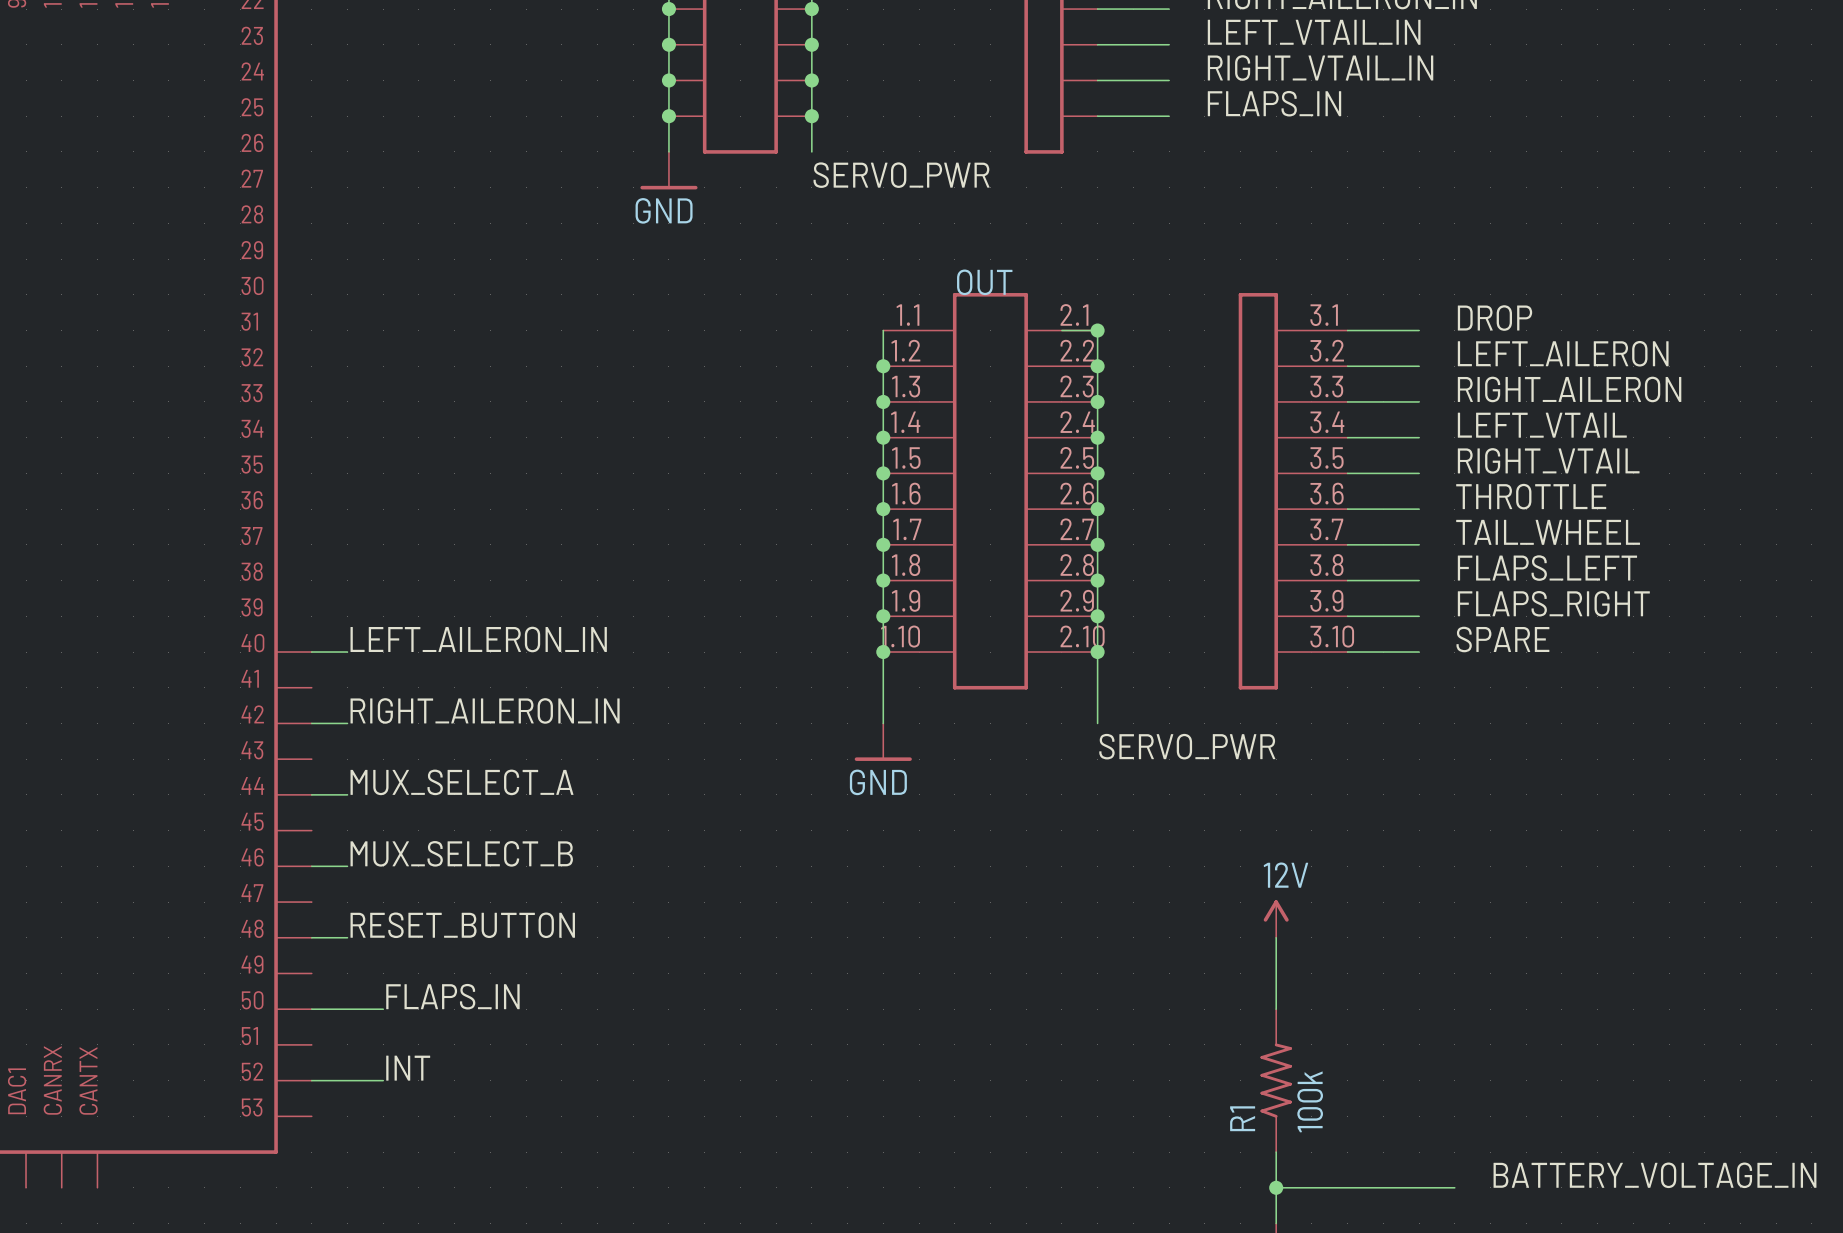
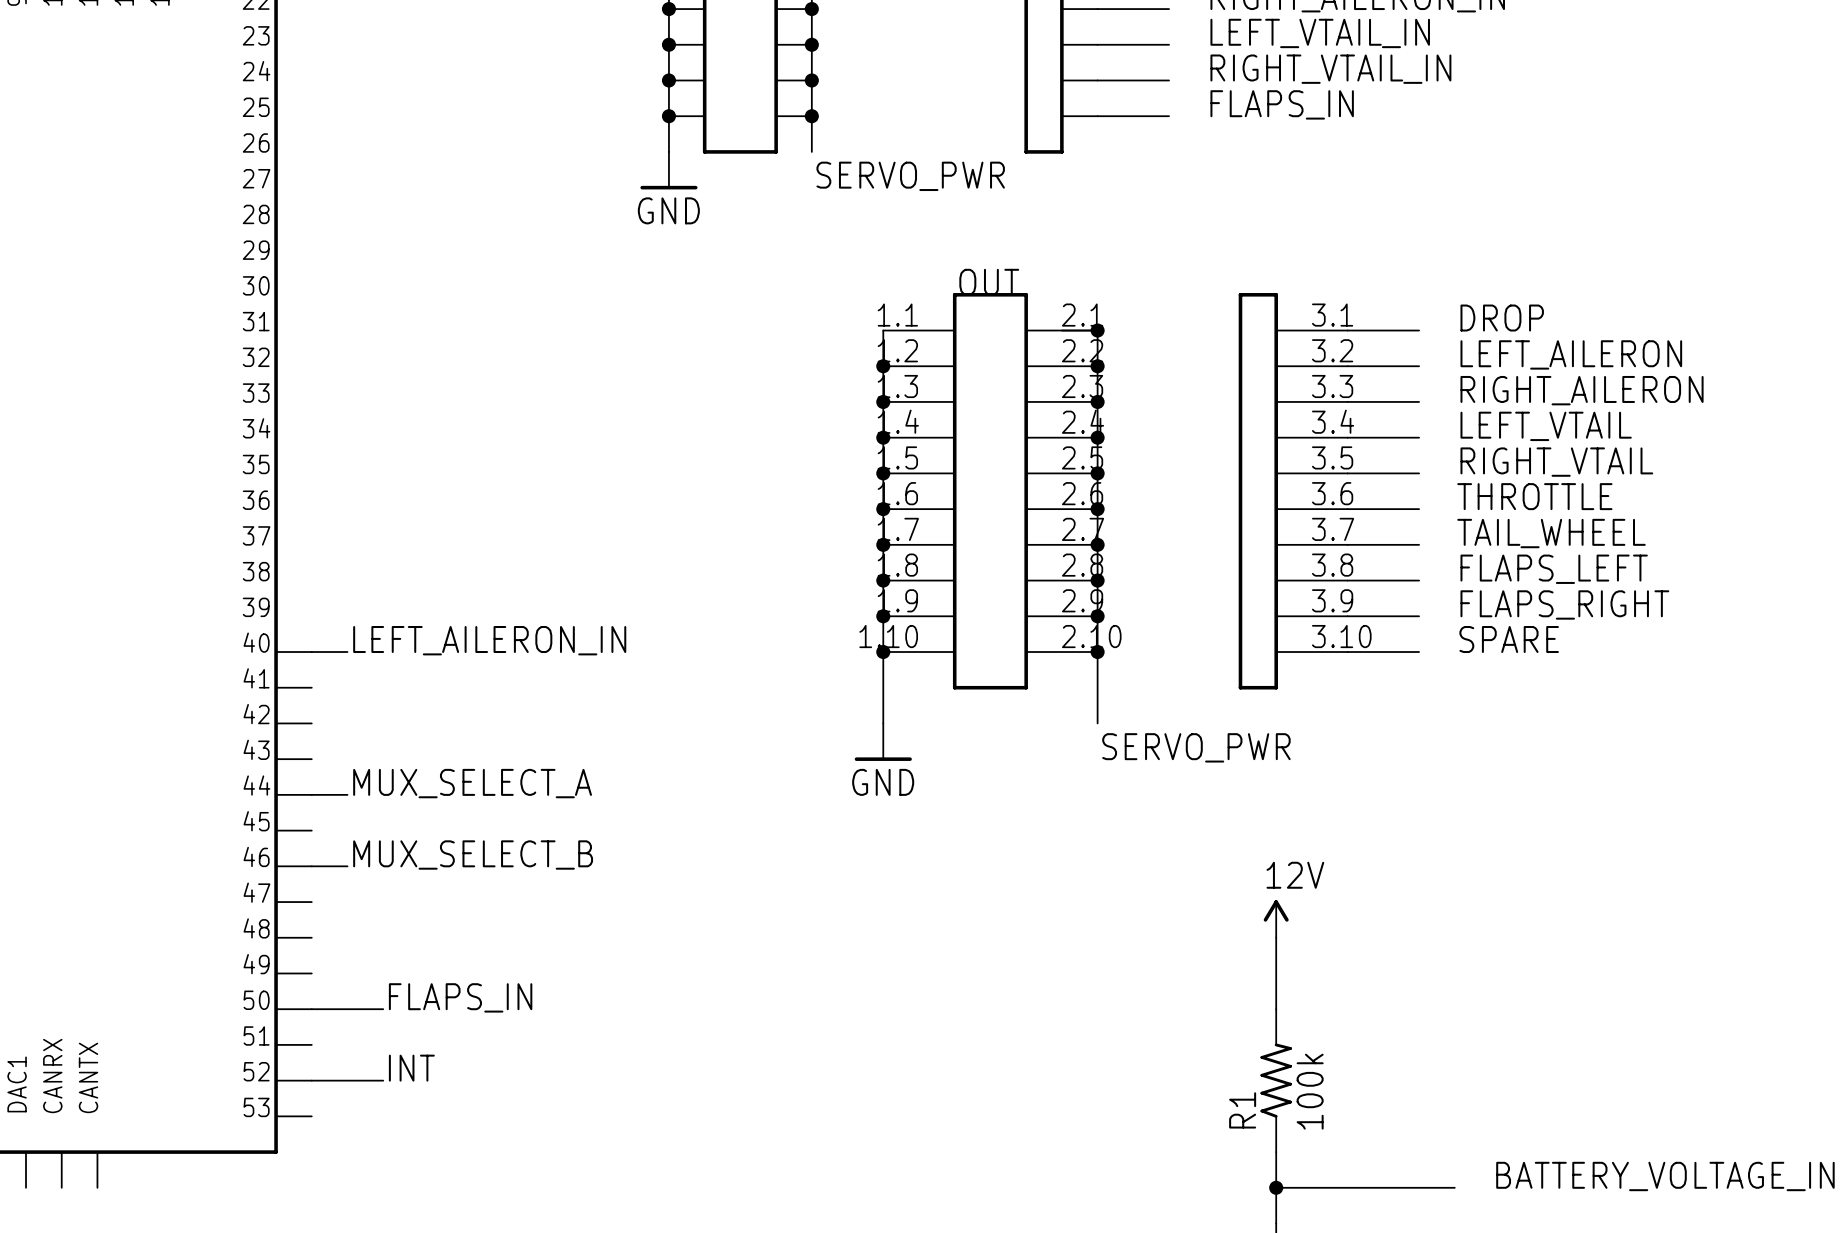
label: RIGHT_AILERON_IN (485, 710) -> none
wire: (311, 723) (347, 723) -> none
label: RESET_BUTTON (462, 925) -> none
wire: (311, 937) (347, 937) -> none

